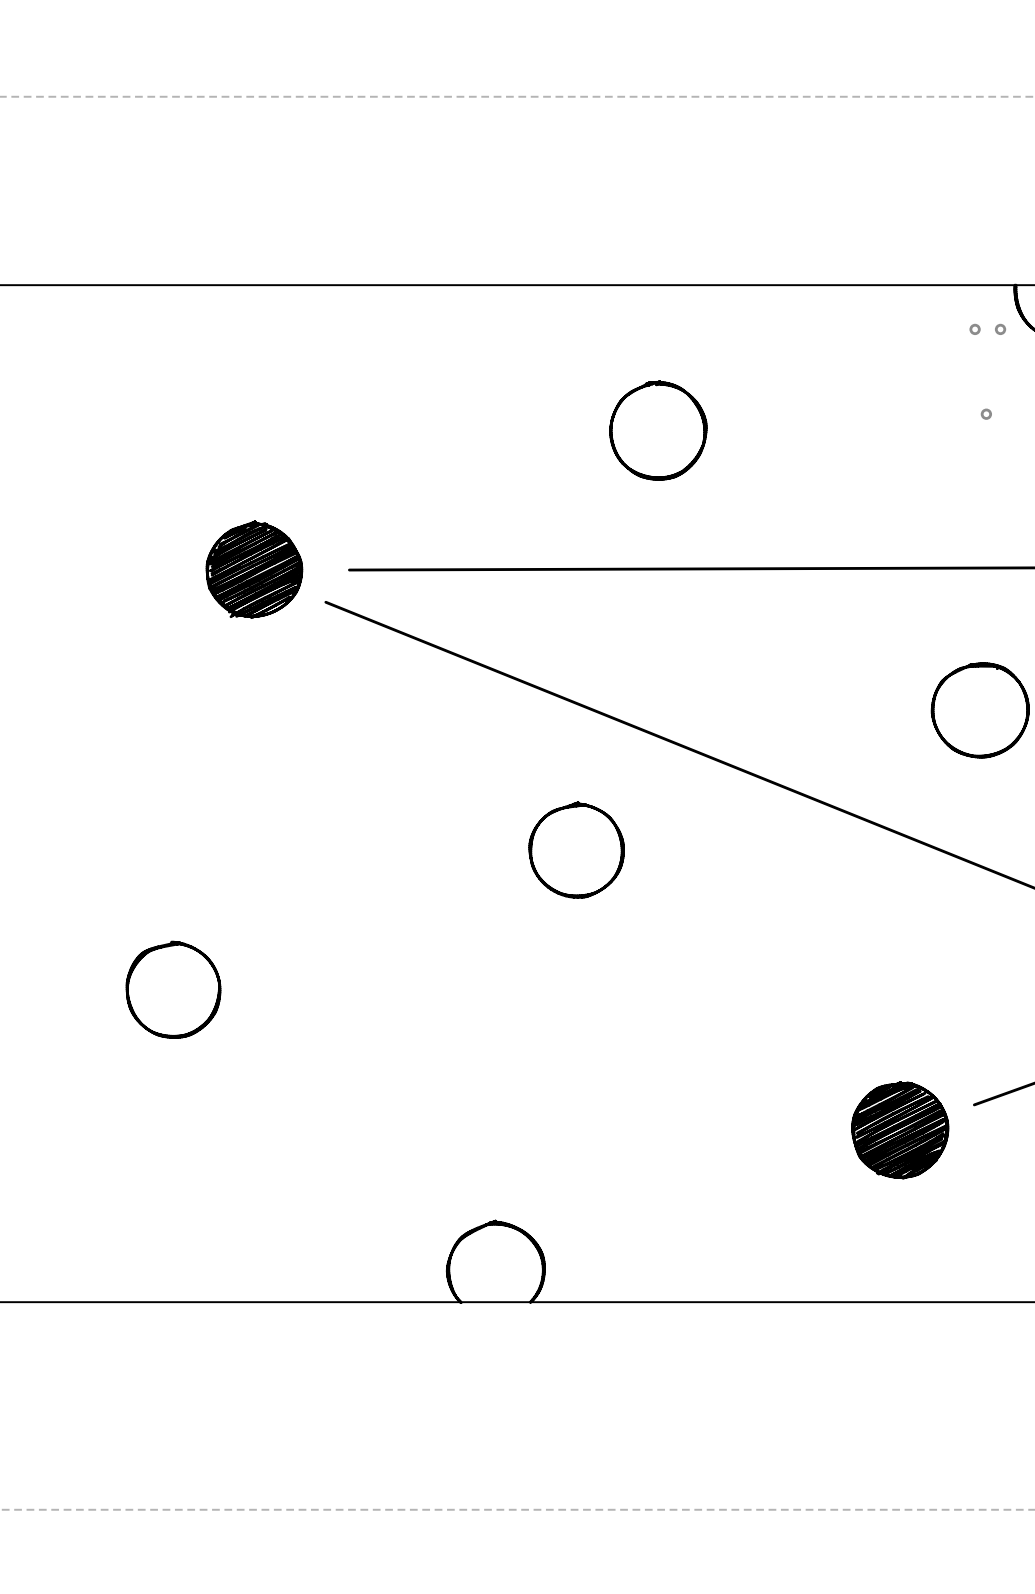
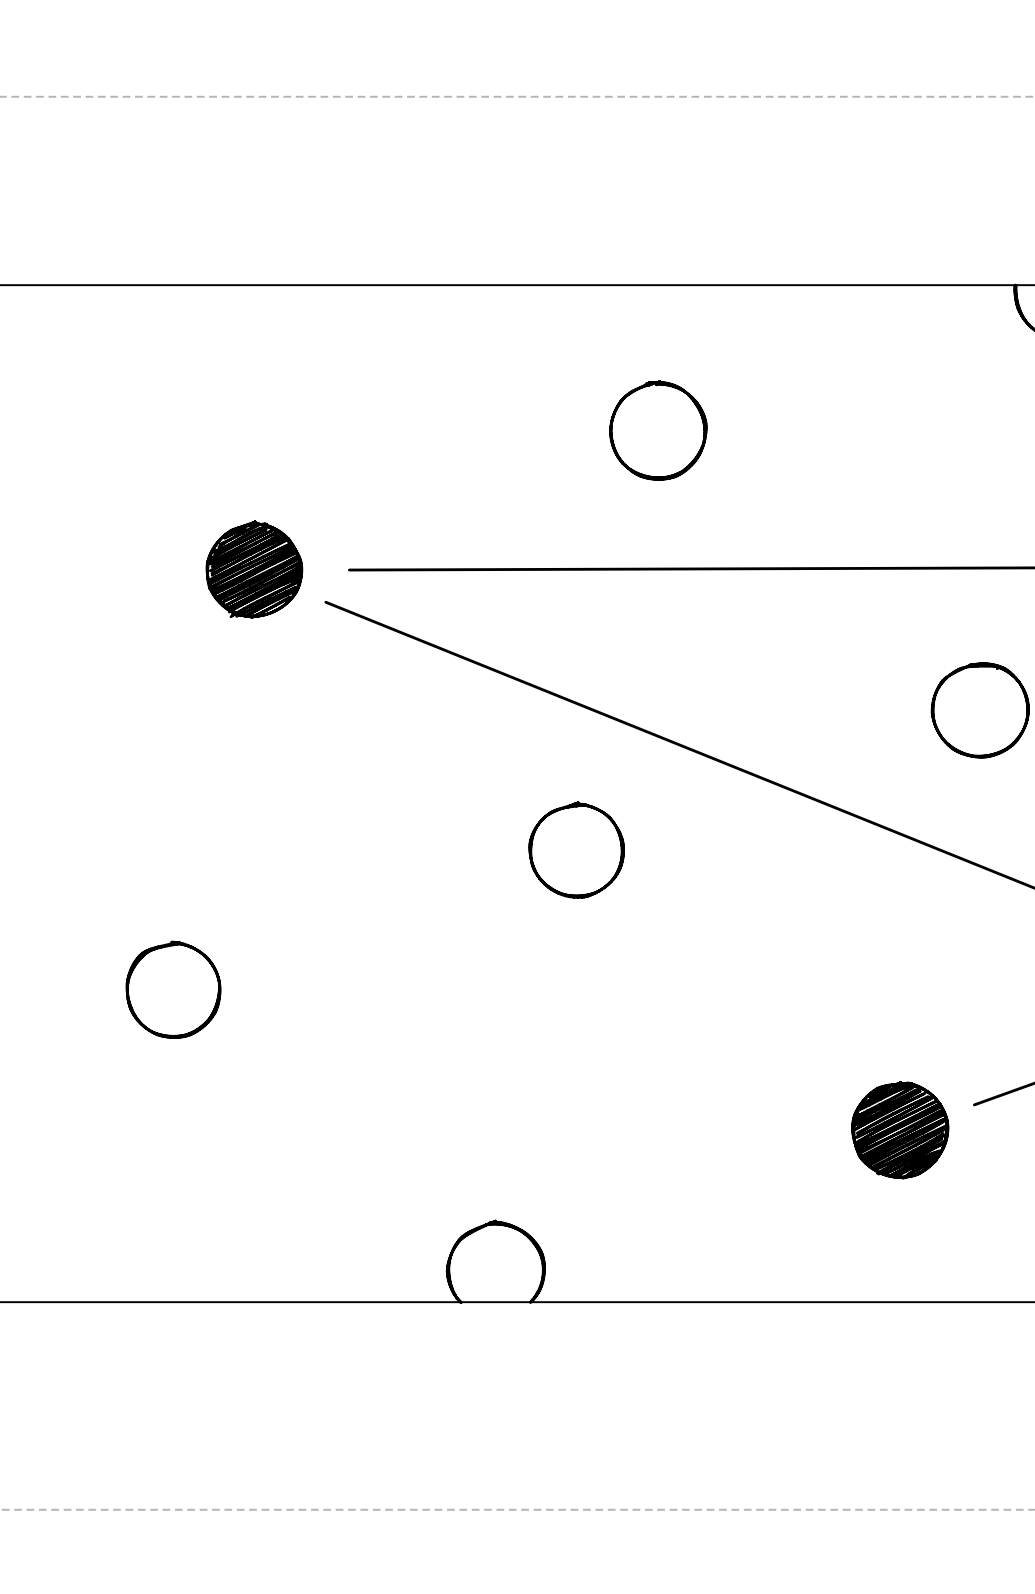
via: (975, 329) -> none
via: (1000, 329) -> none
via: (986, 414) -> none

